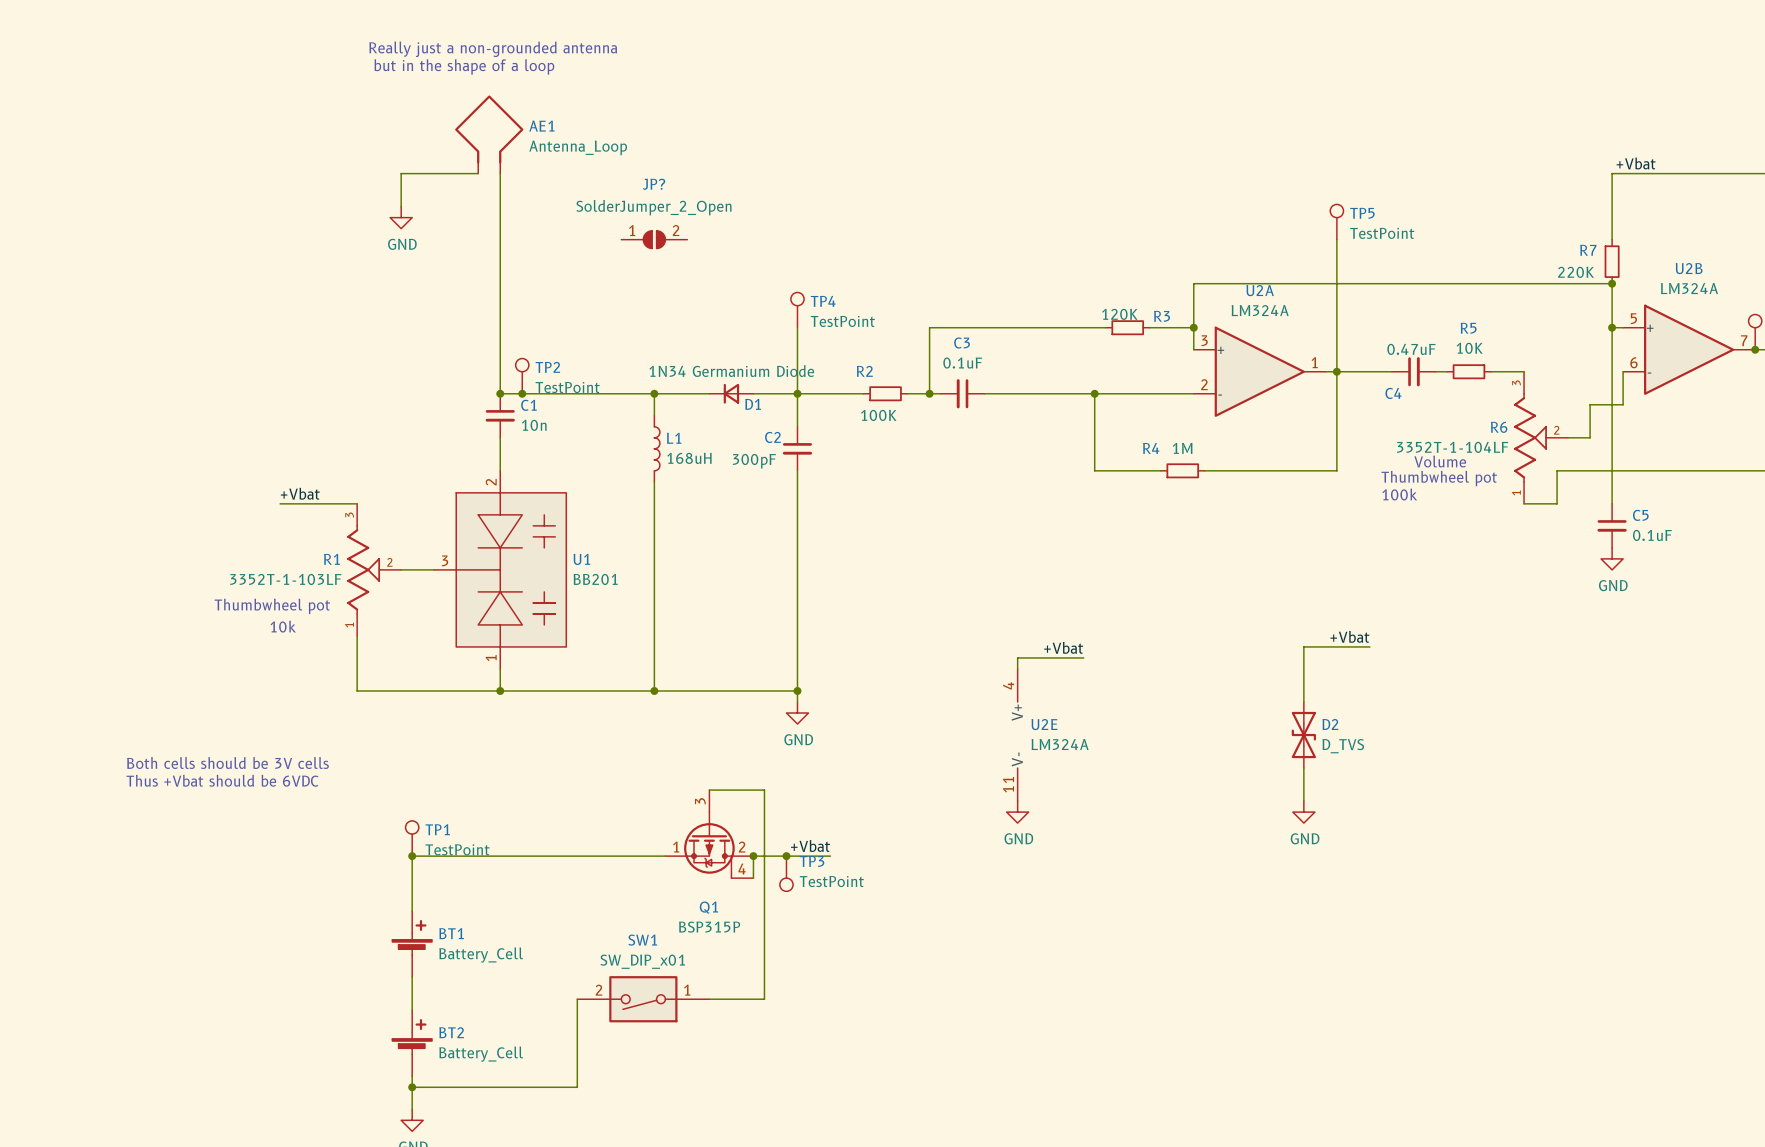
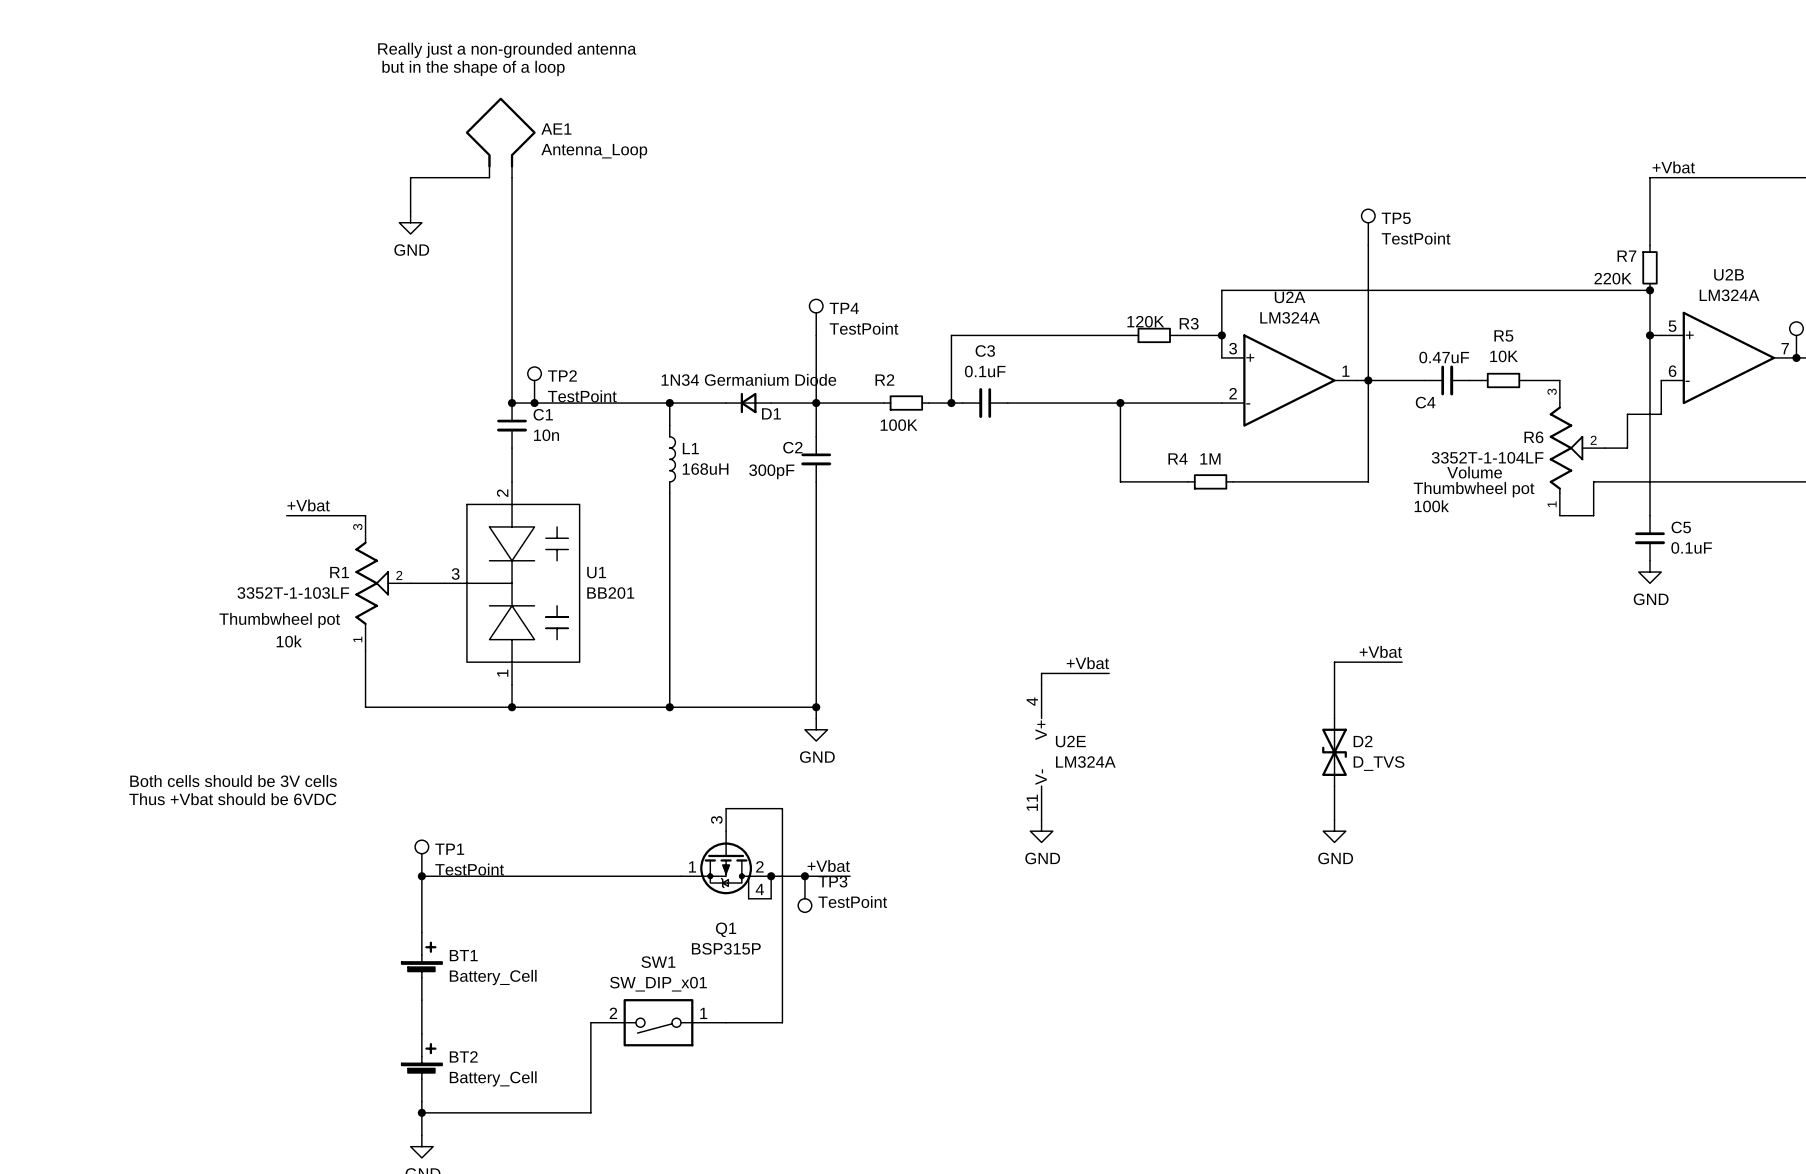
JP?: SolderJumper_2_Open (654, 239) -> none

